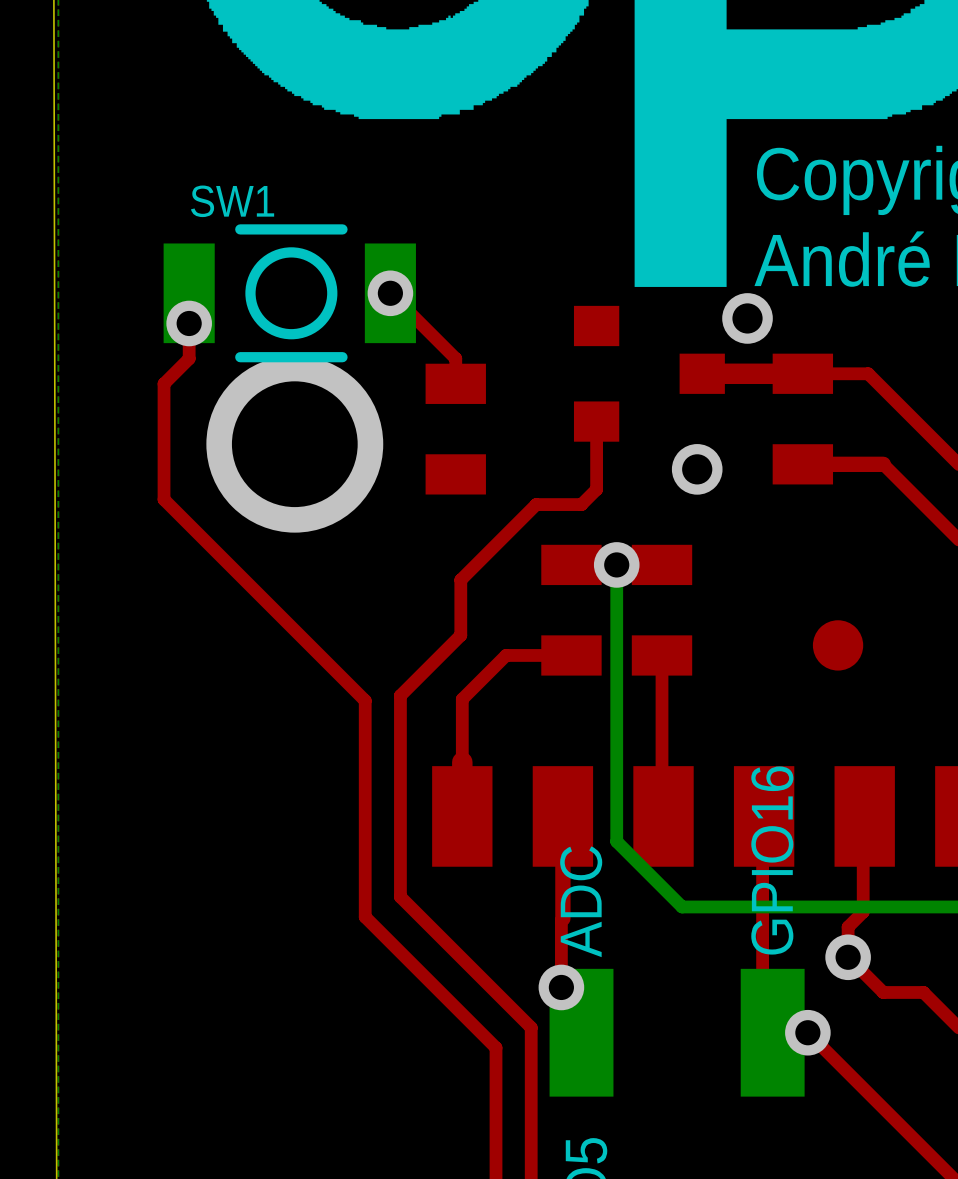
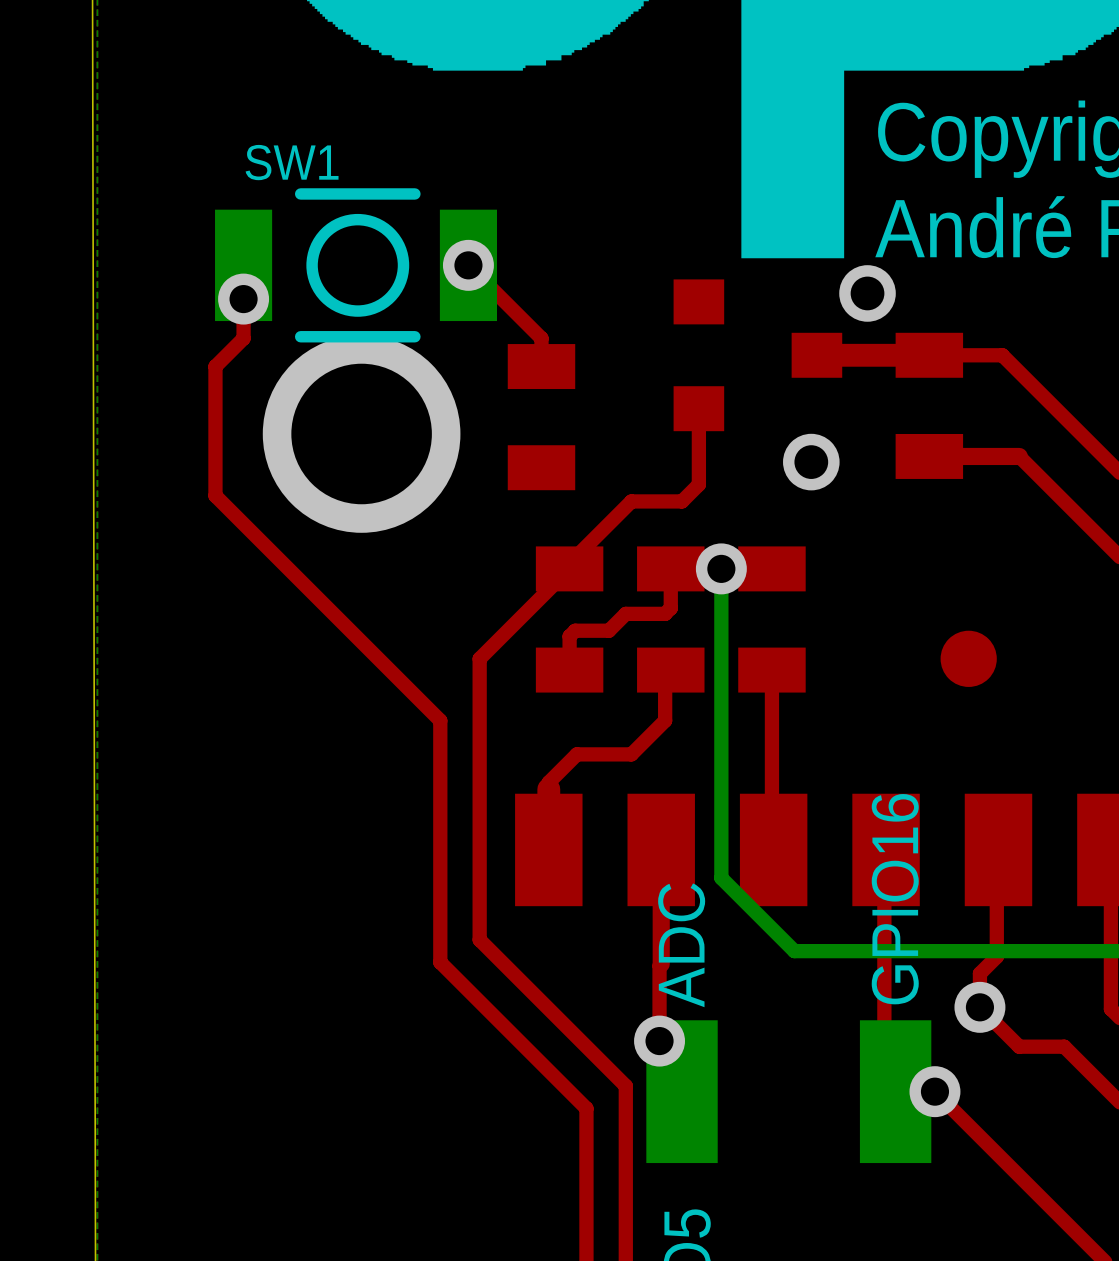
top track: (480, 559) (460, 580) (460, 635) (400, 695) -> (569, 563) (569, 568) (479, 658) (479, 715)
top track: none -> (670, 568) (670, 608) (665, 613) (625, 613) (608, 630) (575, 630) (569, 636) (569, 670)
part: none -> (569, 619)
top track: (566, 655) (506, 655) (462, 699) (462, 756) -> (665, 670) (665, 720) (631, 754) (576, 754) (548, 782)

